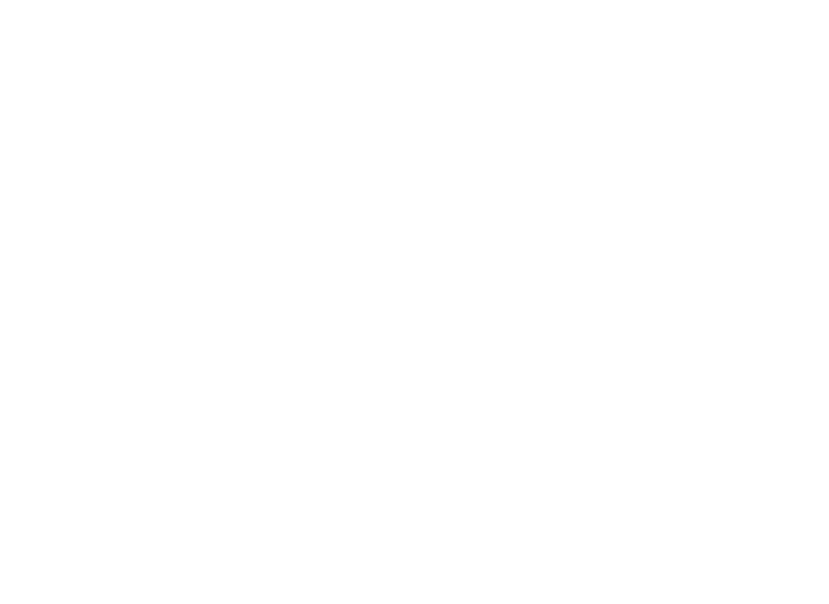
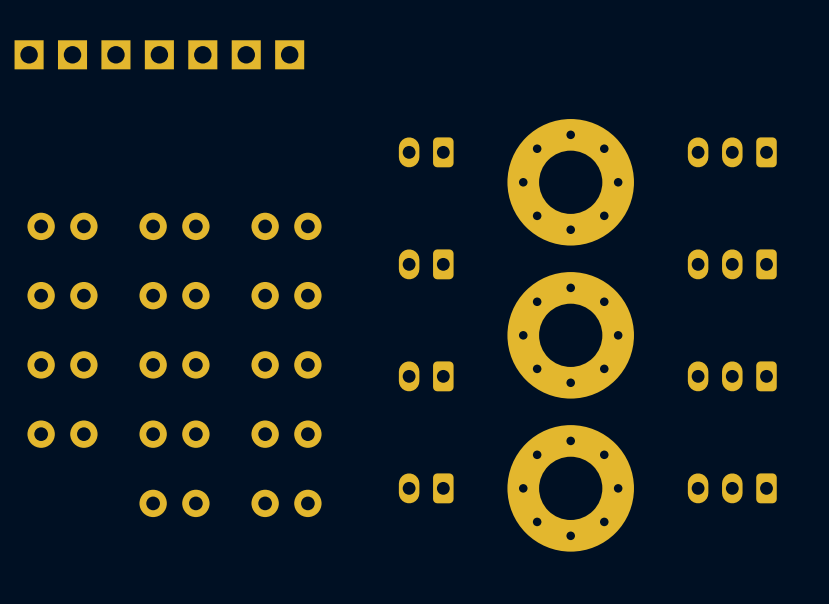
part: none -> (159, 54)
part: none -> (426, 152)
part: none -> (732, 152)
part: none -> (570, 182)
part: none -> (62, 226)
part: none -> (174, 226)
part: none -> (286, 226)
part: none -> (426, 264)
part: none -> (732, 264)
part: none -> (62, 295)
part: none -> (174, 295)
part: none -> (286, 295)
part: none -> (570, 335)
part: none -> (62, 364)
part: none -> (174, 364)
part: none -> (286, 364)
part: none -> (426, 376)
part: none -> (732, 376)
part: none -> (62, 434)
part: none -> (174, 434)
part: none -> (286, 434)
part: none -> (426, 488)
part: none -> (570, 488)
part: none -> (732, 488)
part: none -> (174, 503)
part: none -> (286, 503)

